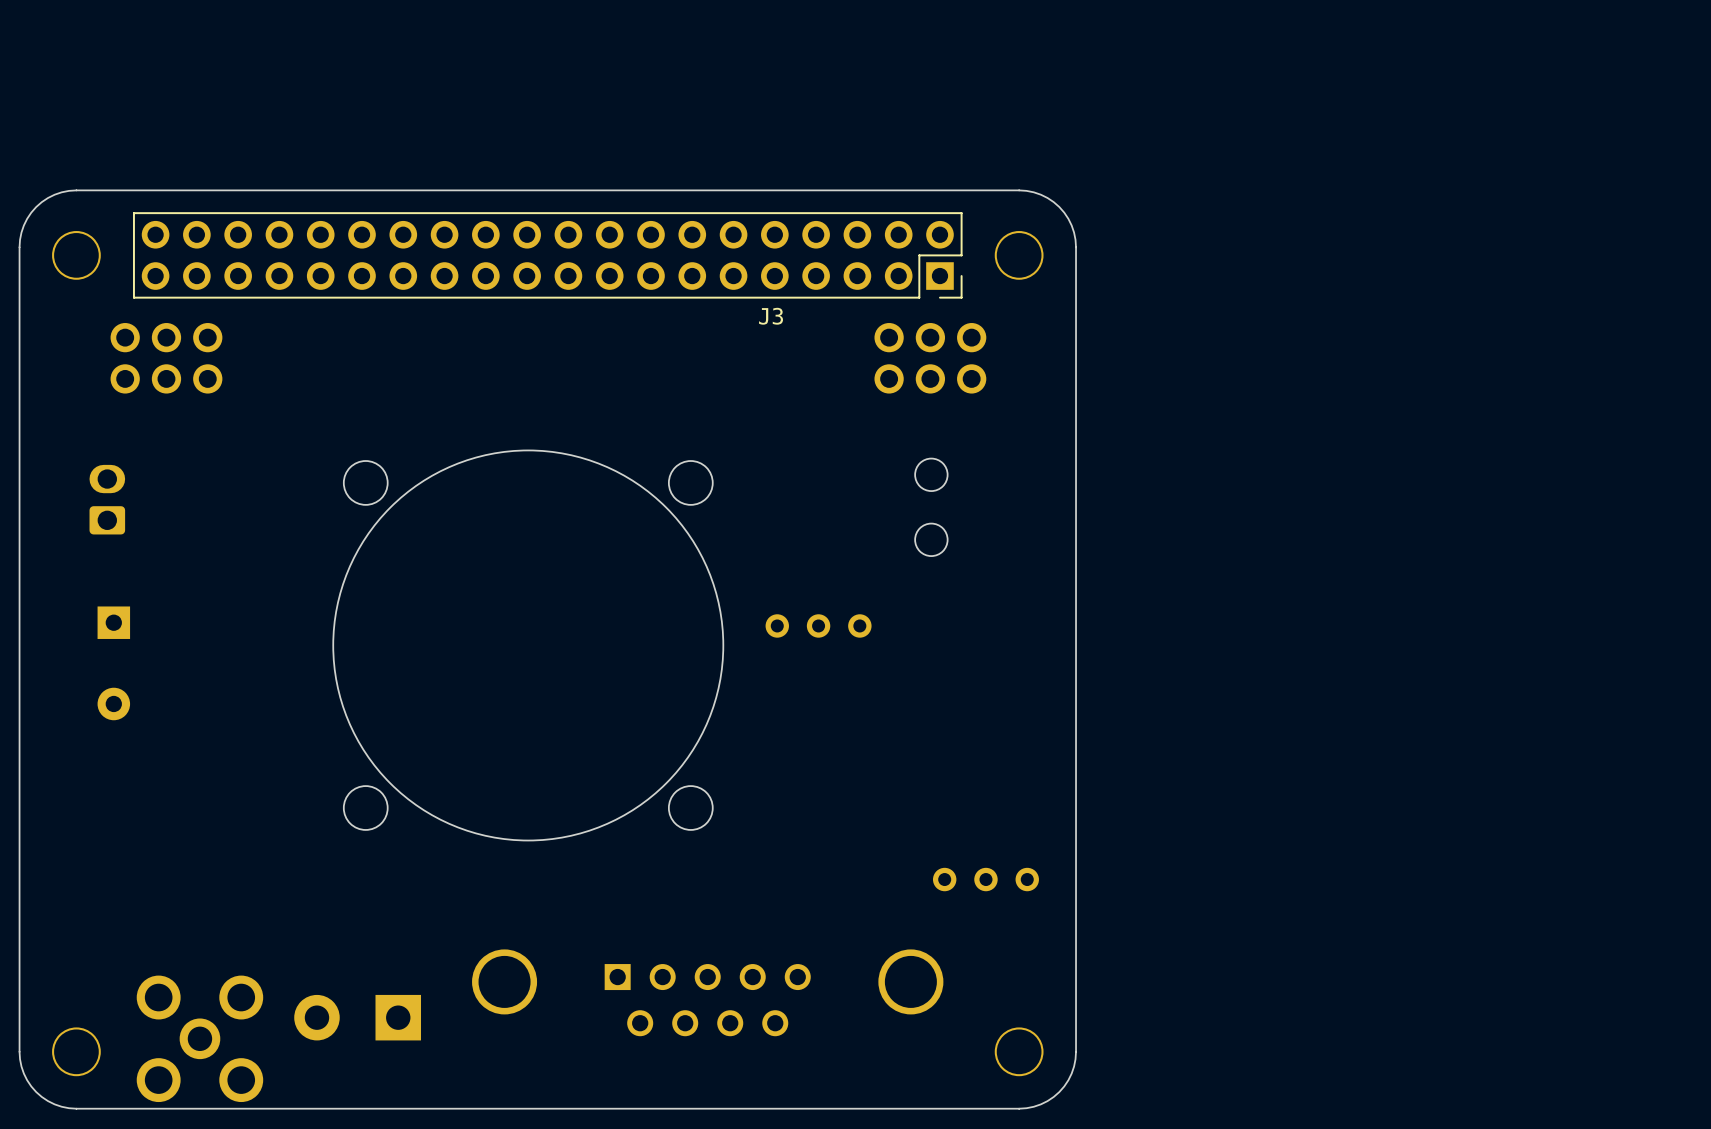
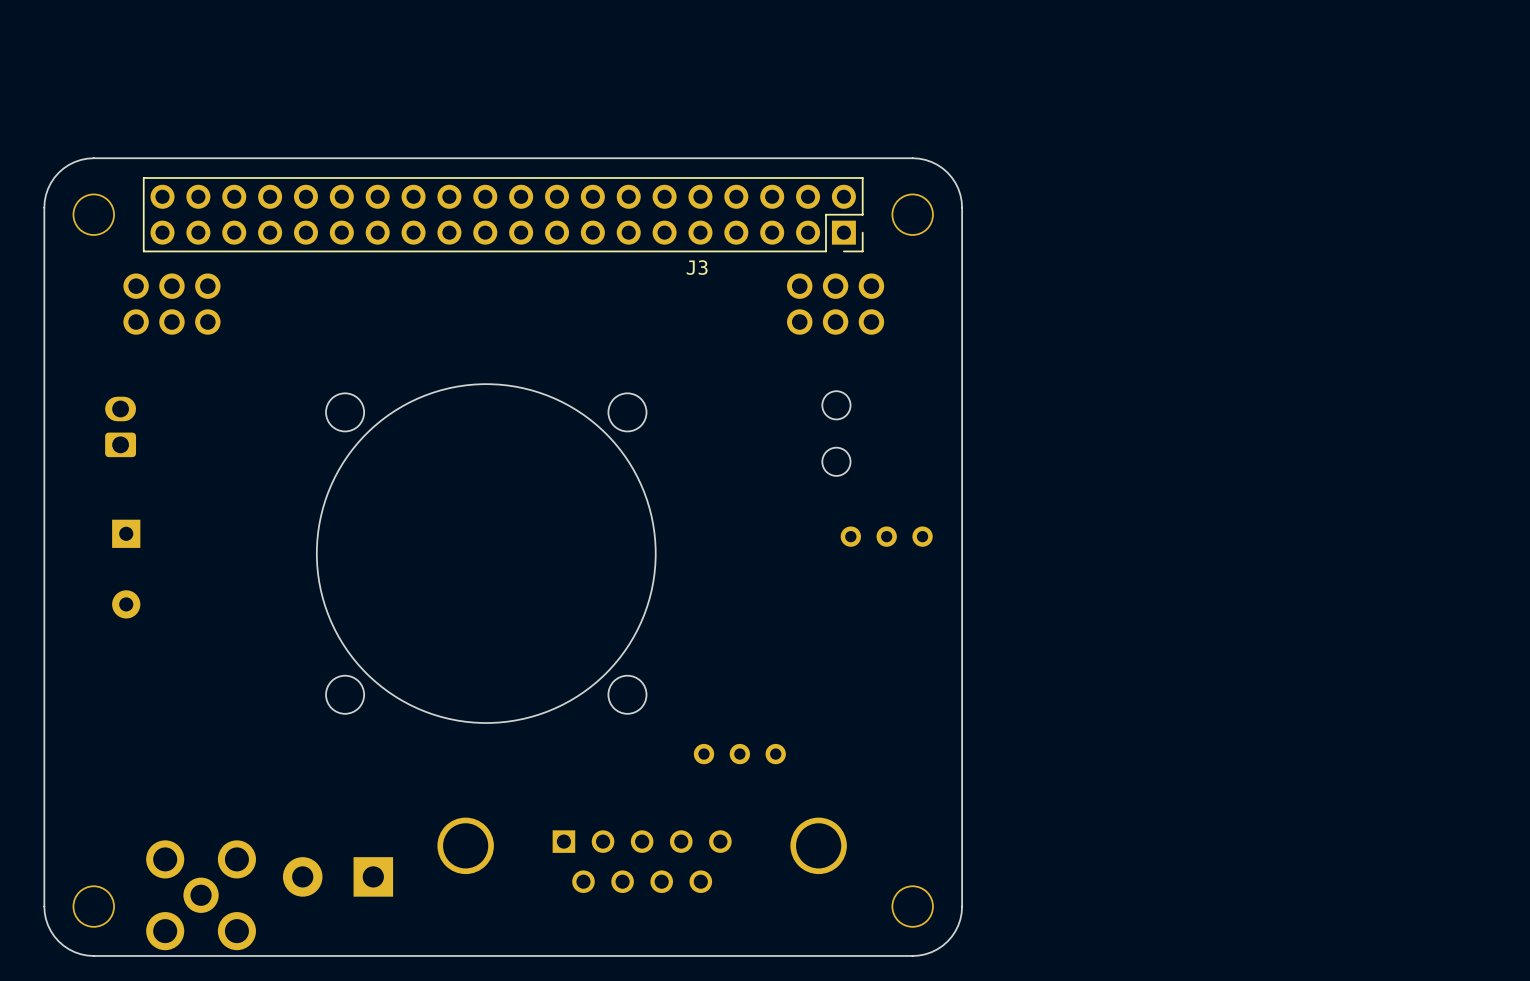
part: (818, 625) -> none
part: none -> (886, 536)
part: none -> (739, 754)
part: (985, 879) -> none

